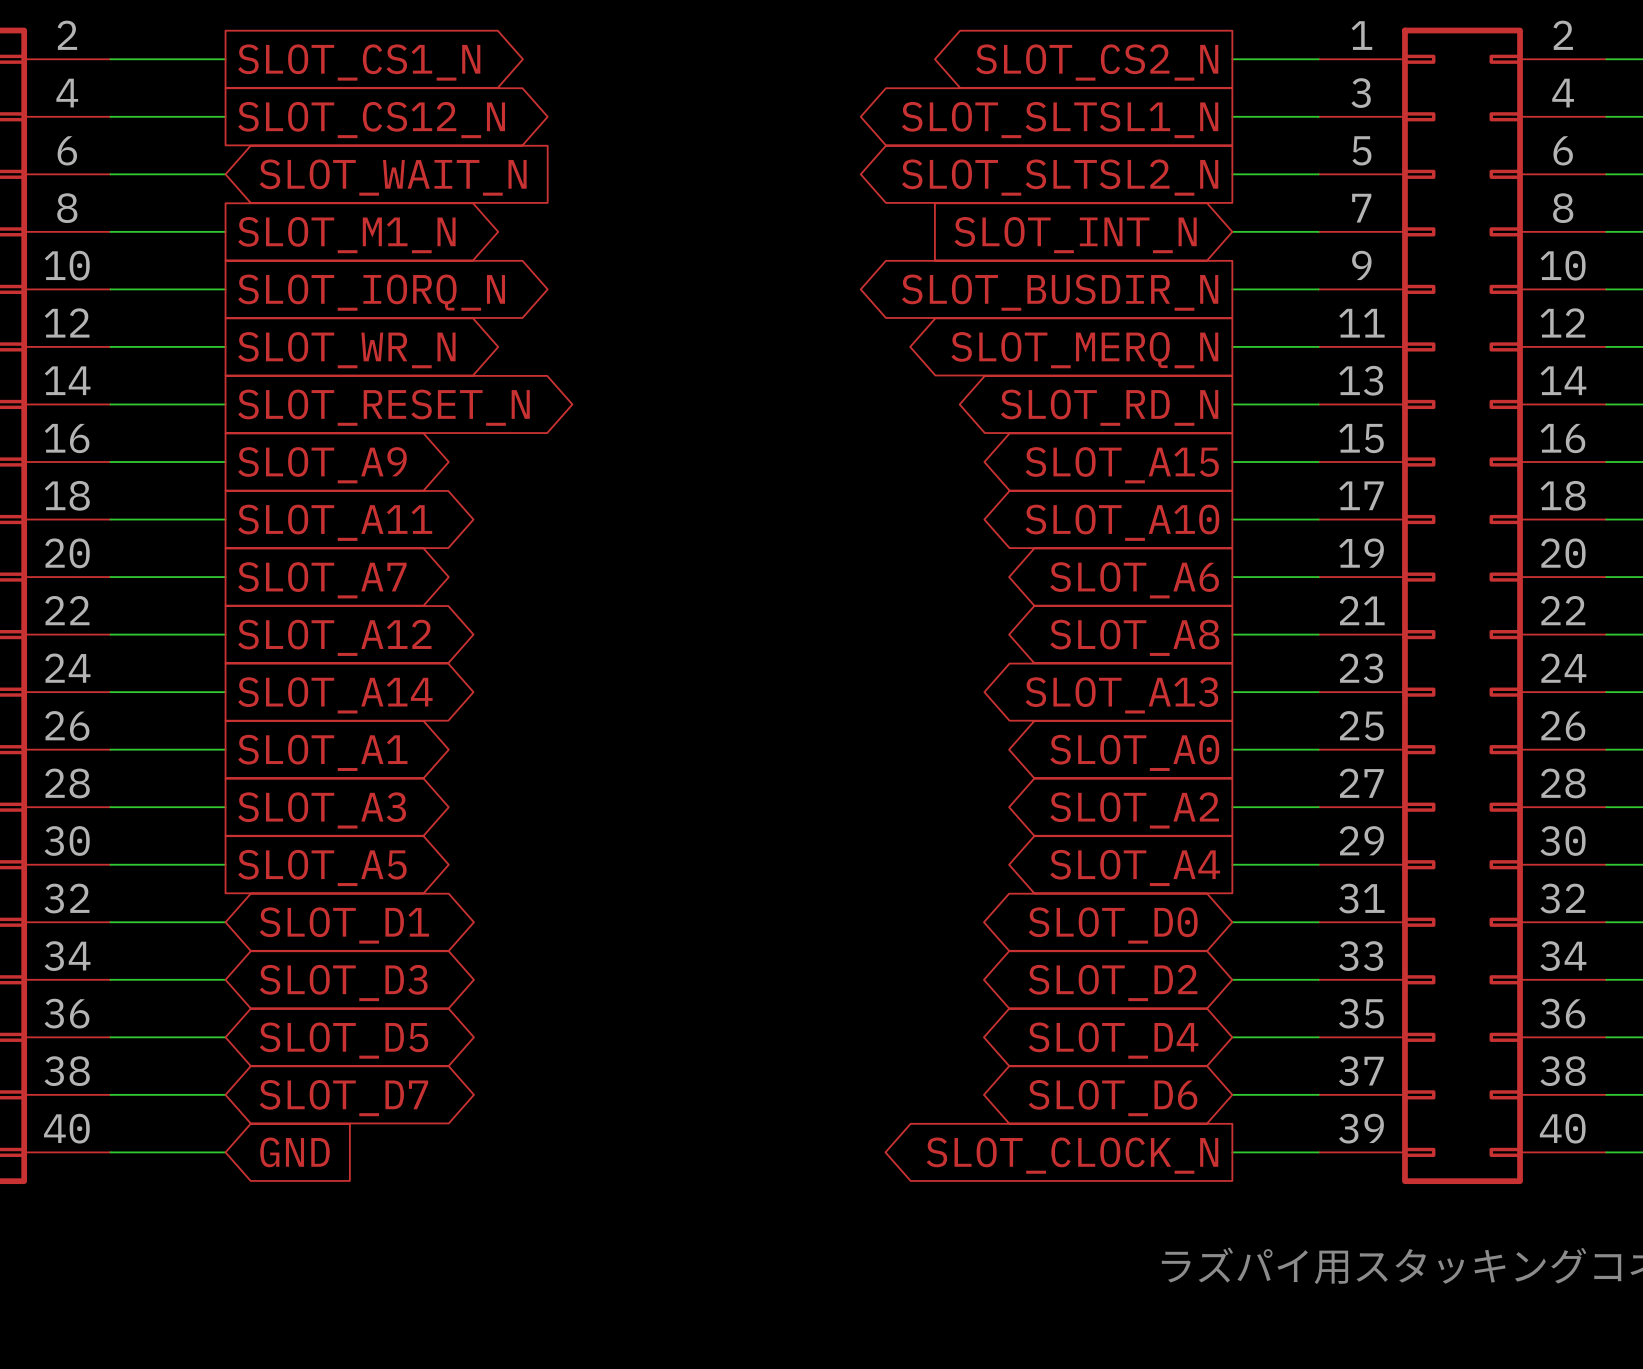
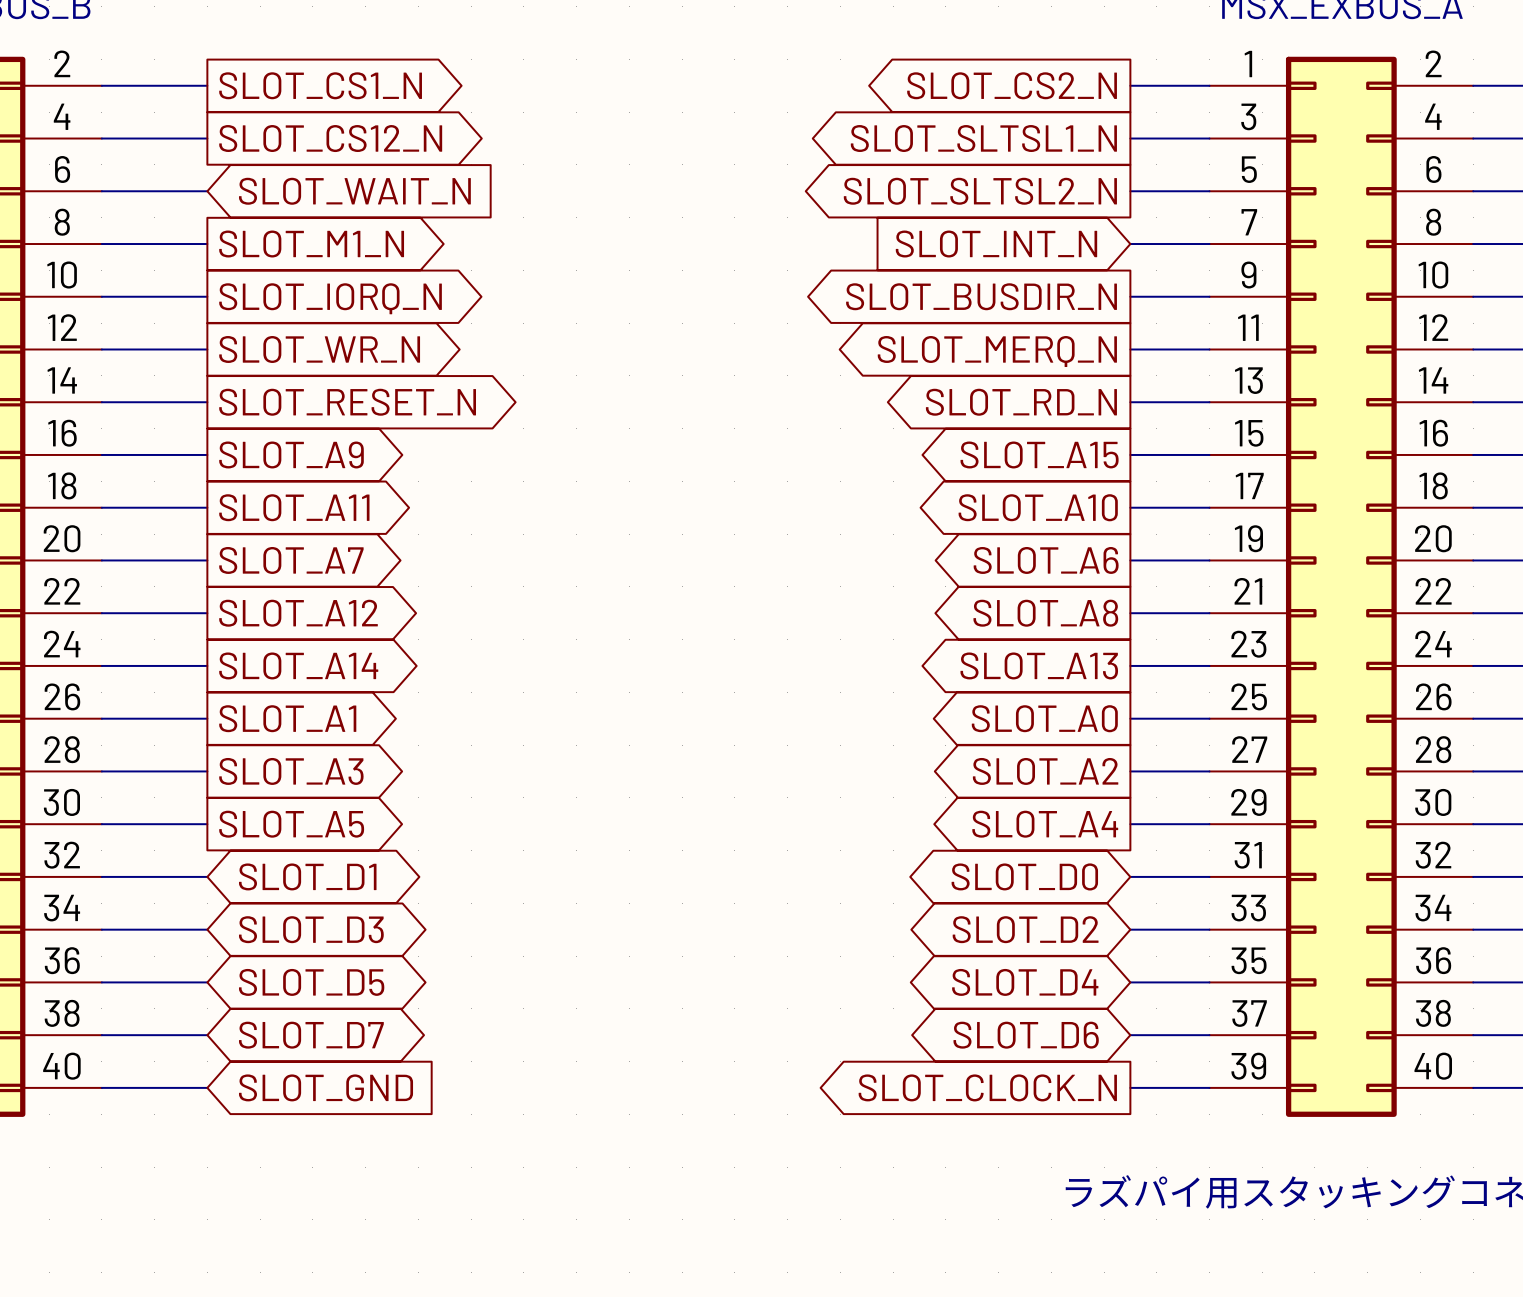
global label: GND (294, 1152) -> SLOT_GND (326, 1087)

